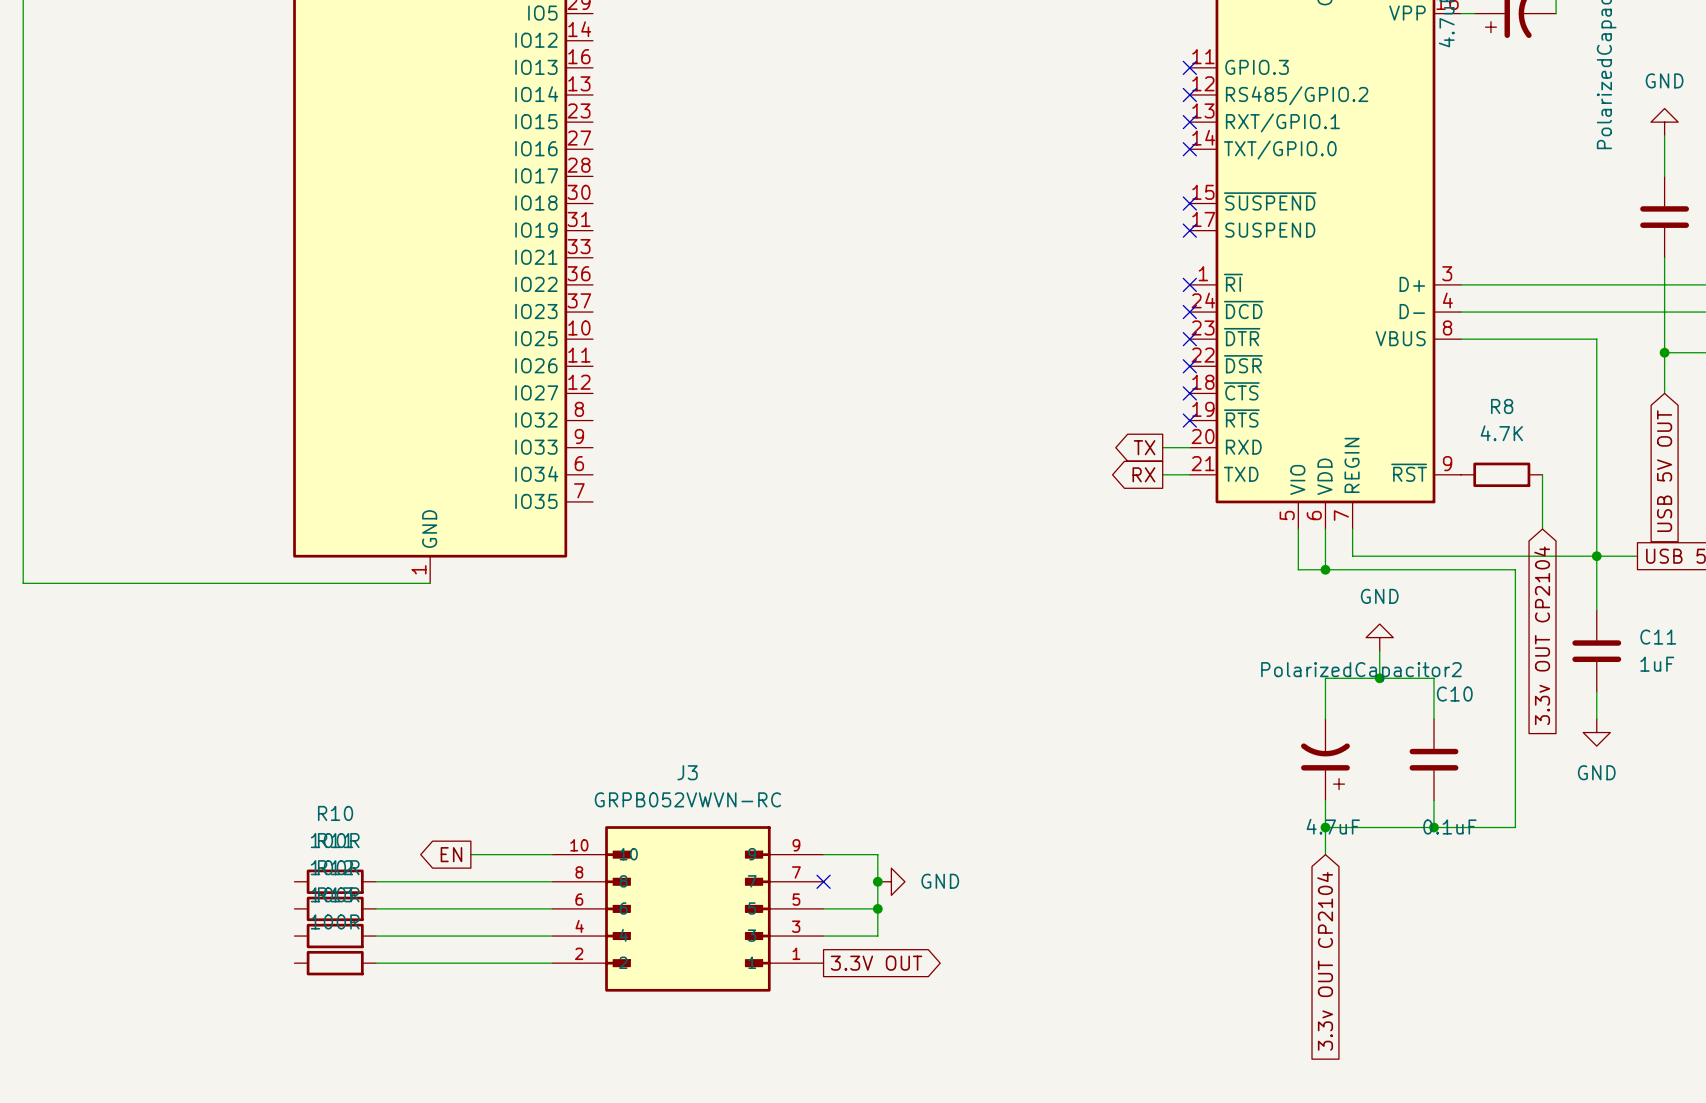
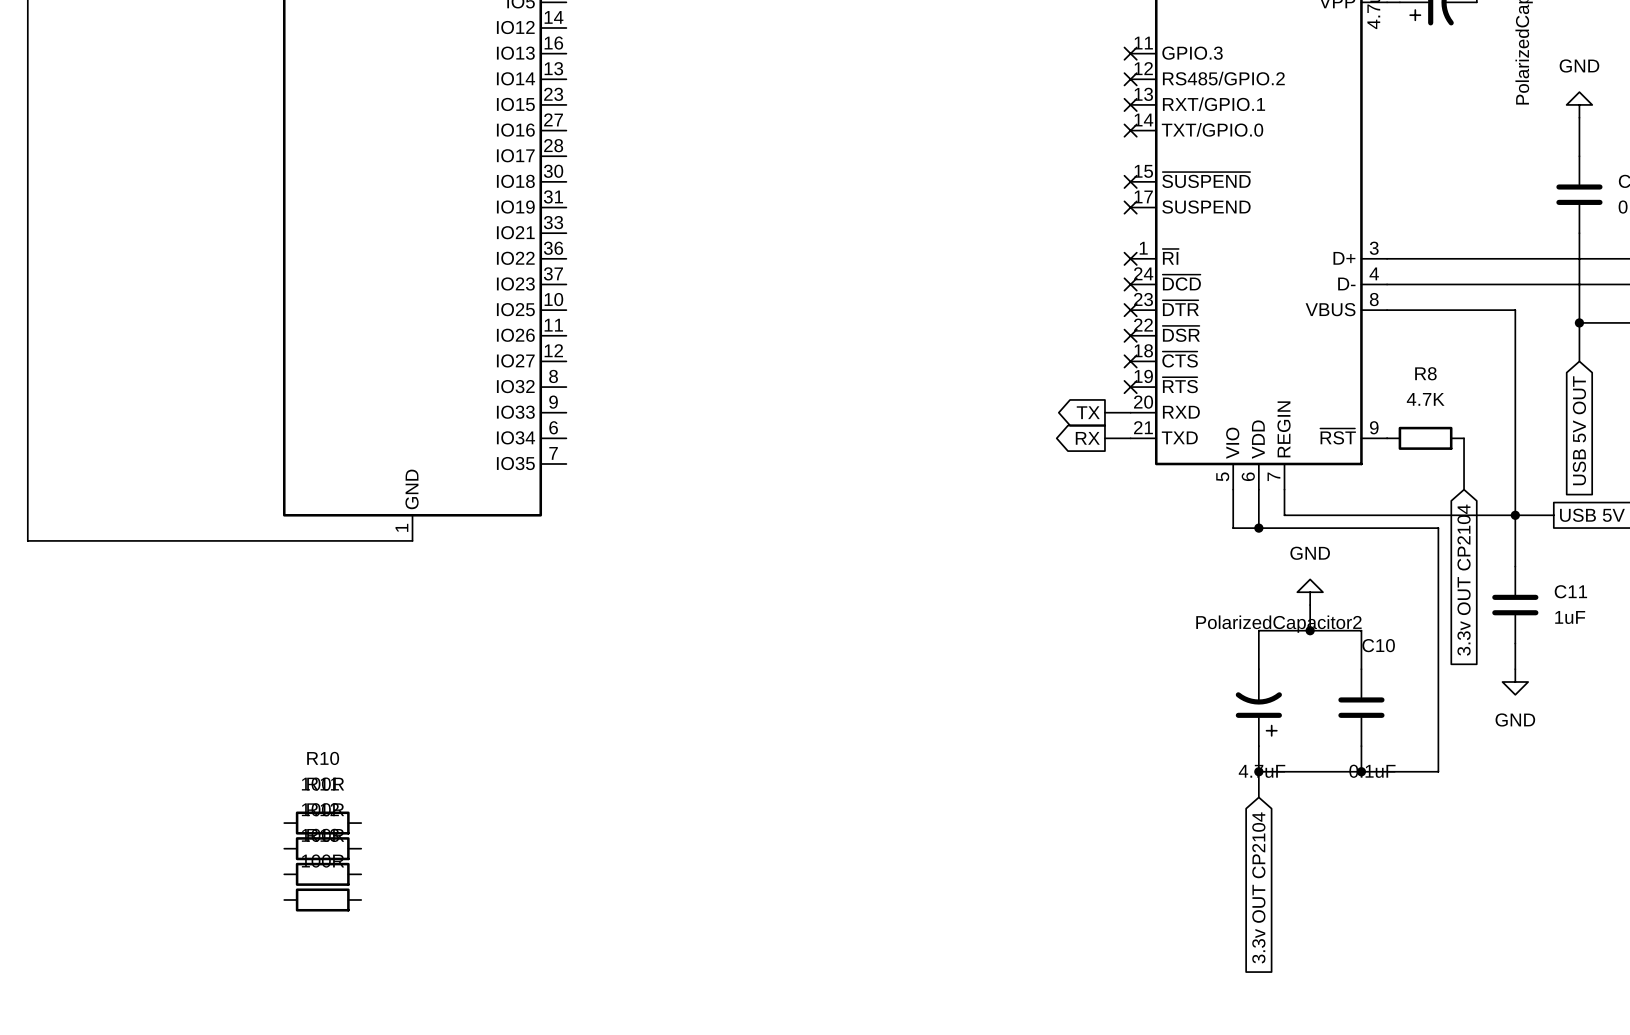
global label: EN (451, 854) -> none
wire: (470, 854) (552, 854) -> none
wire: (823, 854) (877, 854) (877, 936) (823, 936) -> none
wire: (375, 881) (552, 881) -> none
no-connect mark: (823, 881) -> none
junction: (877, 881) -> none
power symbol: GND (891, 881) -> none
wire: (375, 908) (552, 908) -> none
J3: GRPB052VWVN-RC (687, 908) -> none
wire: (823, 908) (877, 908) -> none
junction: (877, 908) -> none
wire: (375, 936) (552, 936) -> none
wire: (375, 963) (552, 963) -> none
global label: 3.3V OUT (876, 963) -> none

